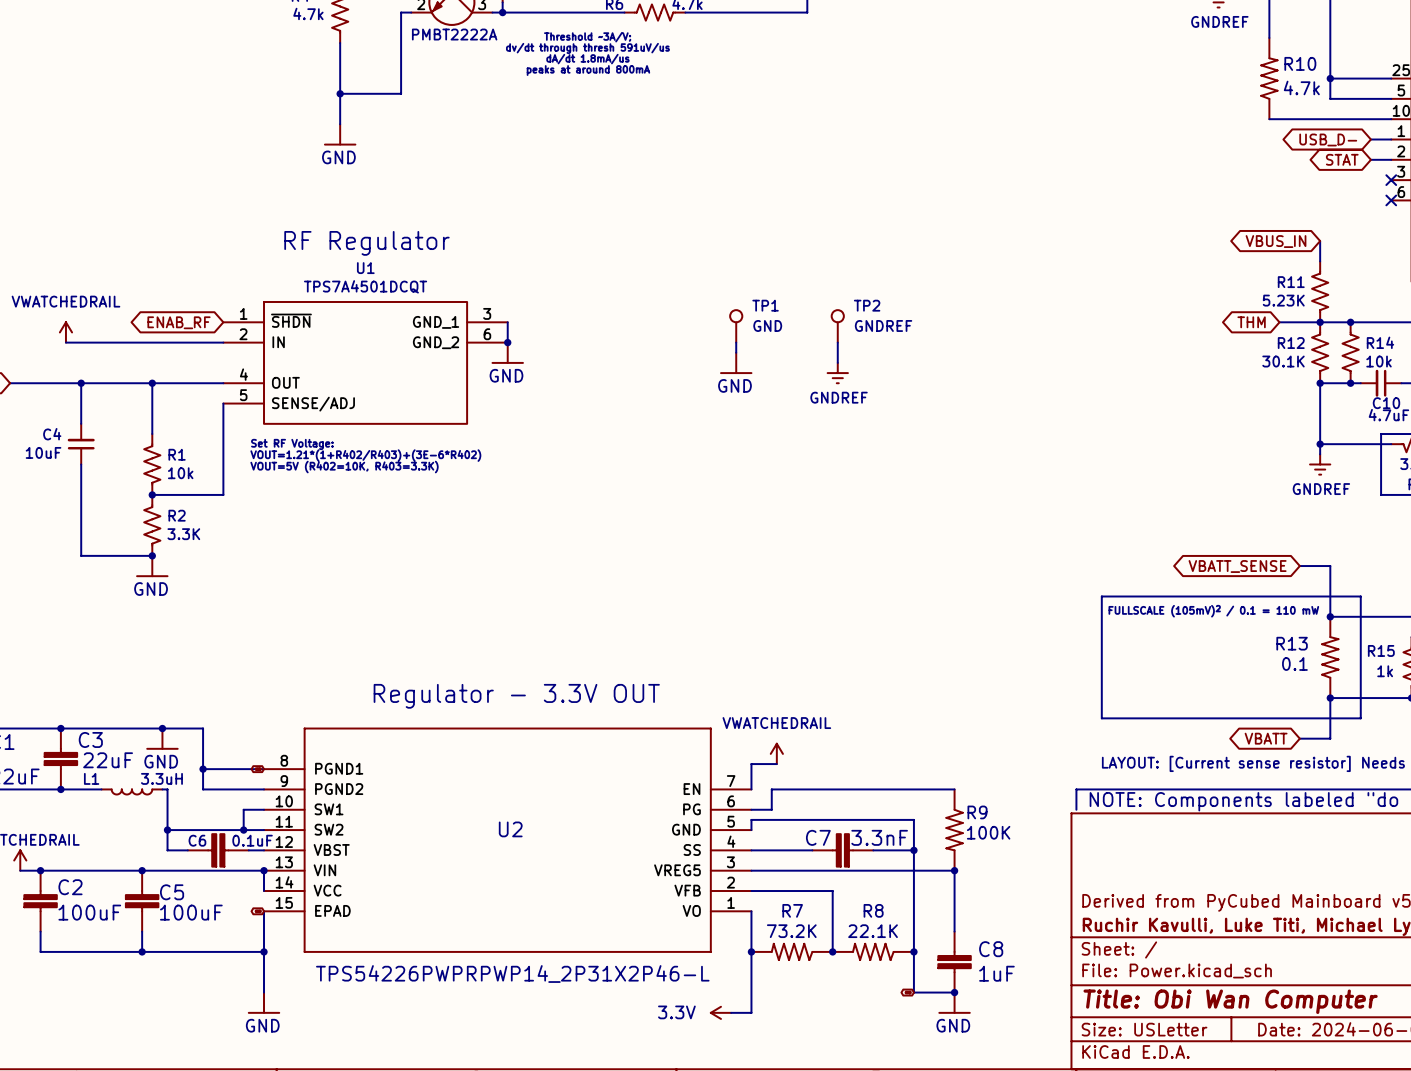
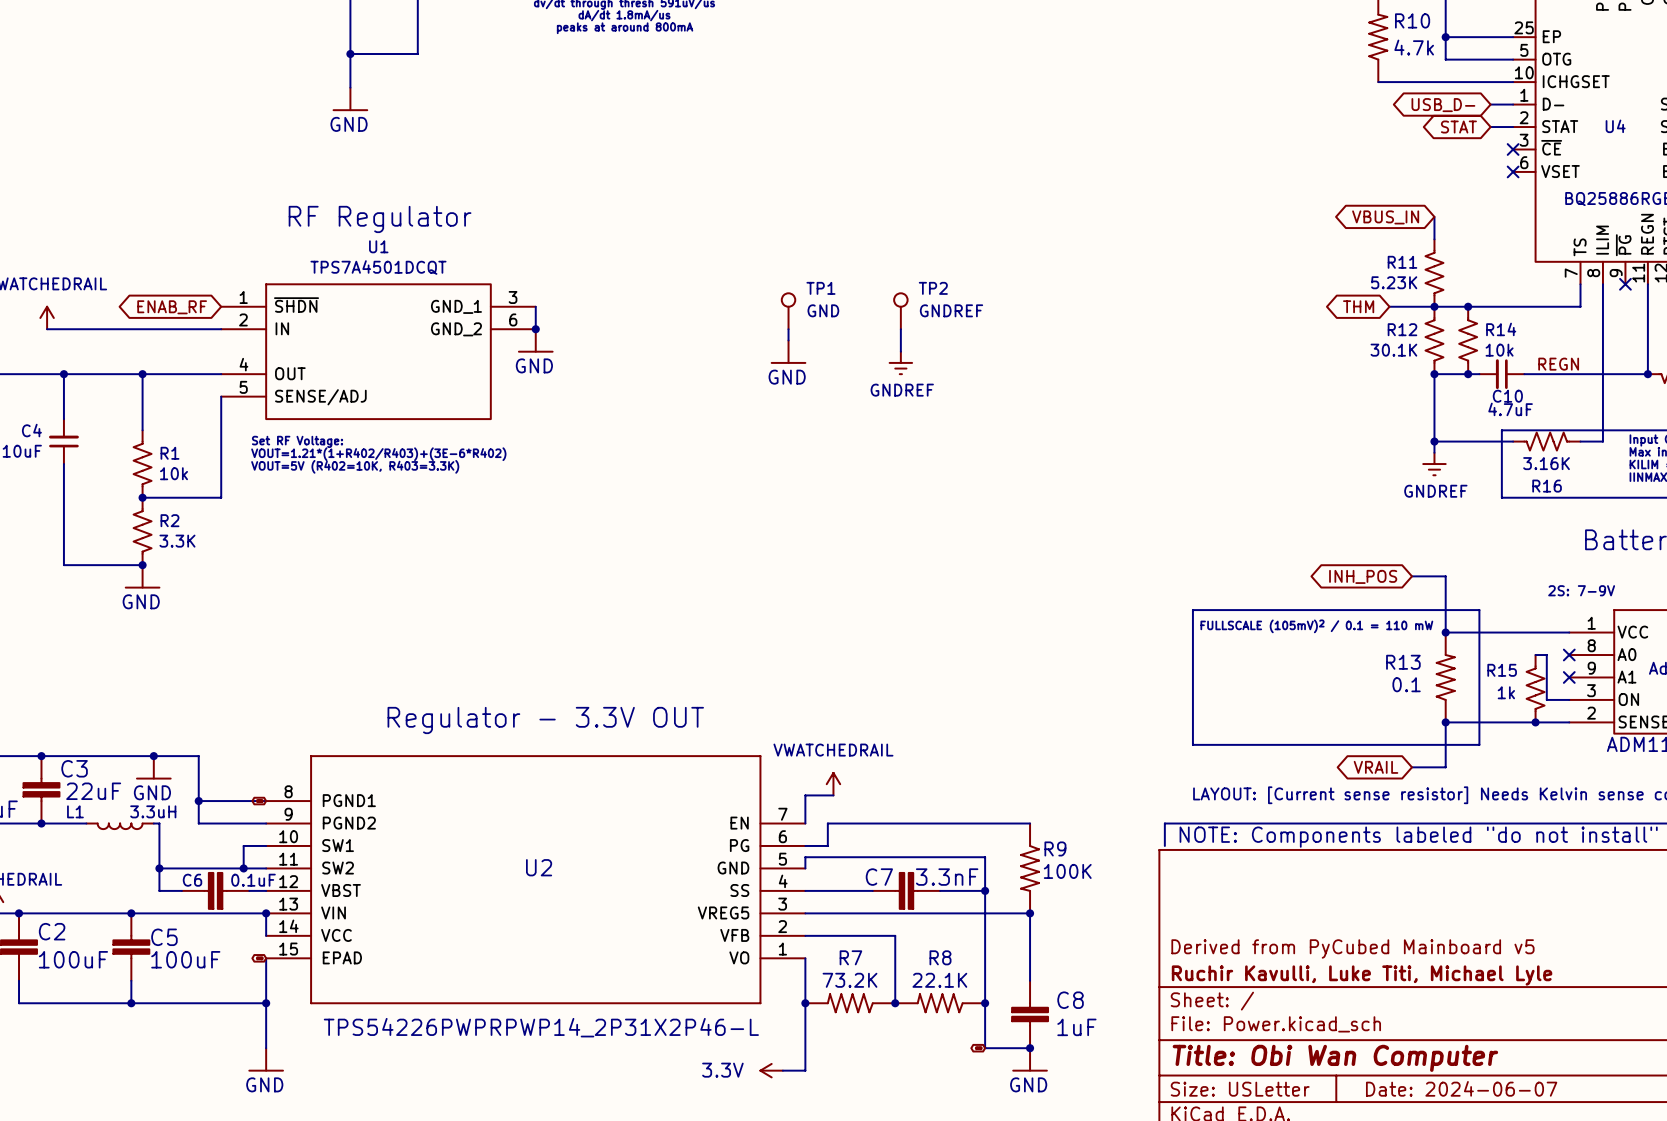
global label: VBATT_SENSE (1237, 566) -> INH_POS (1363, 576)
global label: VBATT (1266, 738) -> VRAIL (1376, 767)

